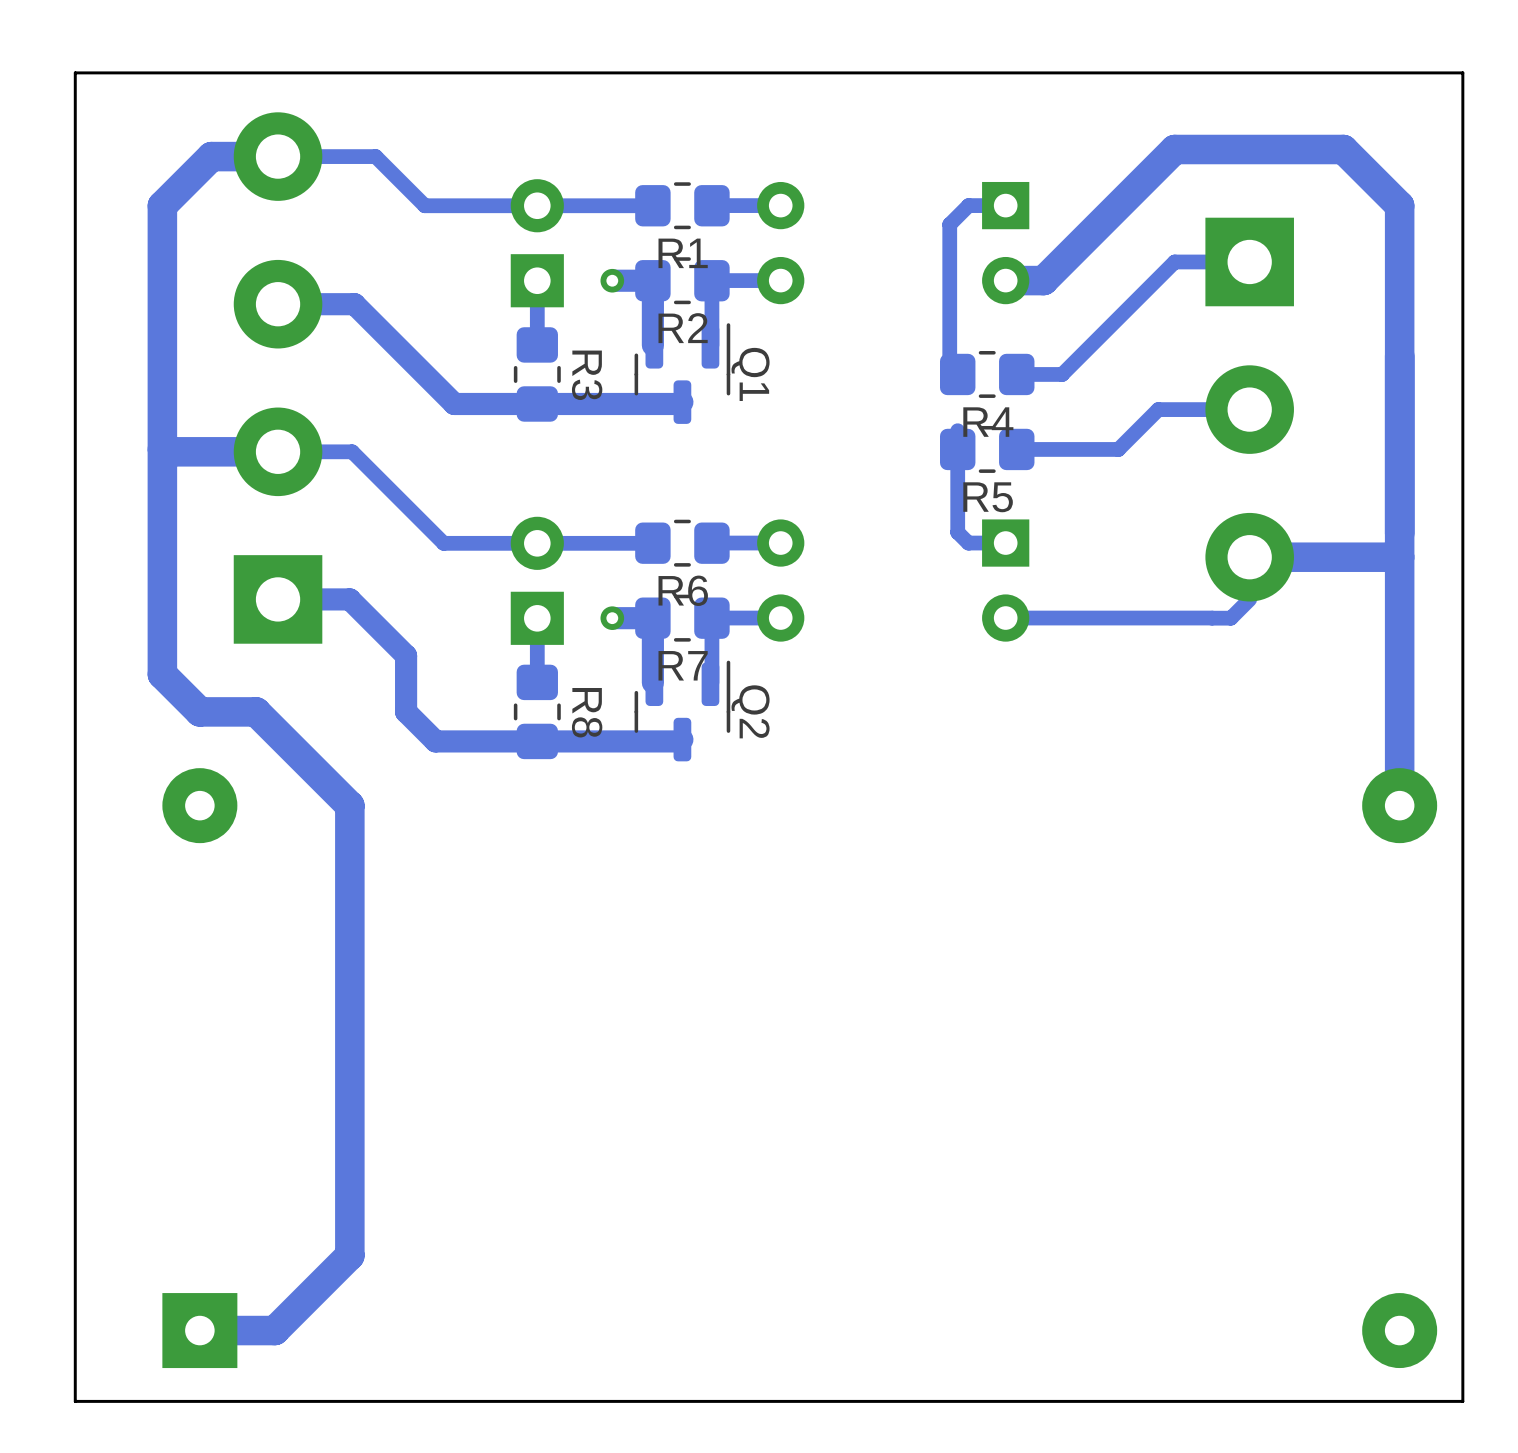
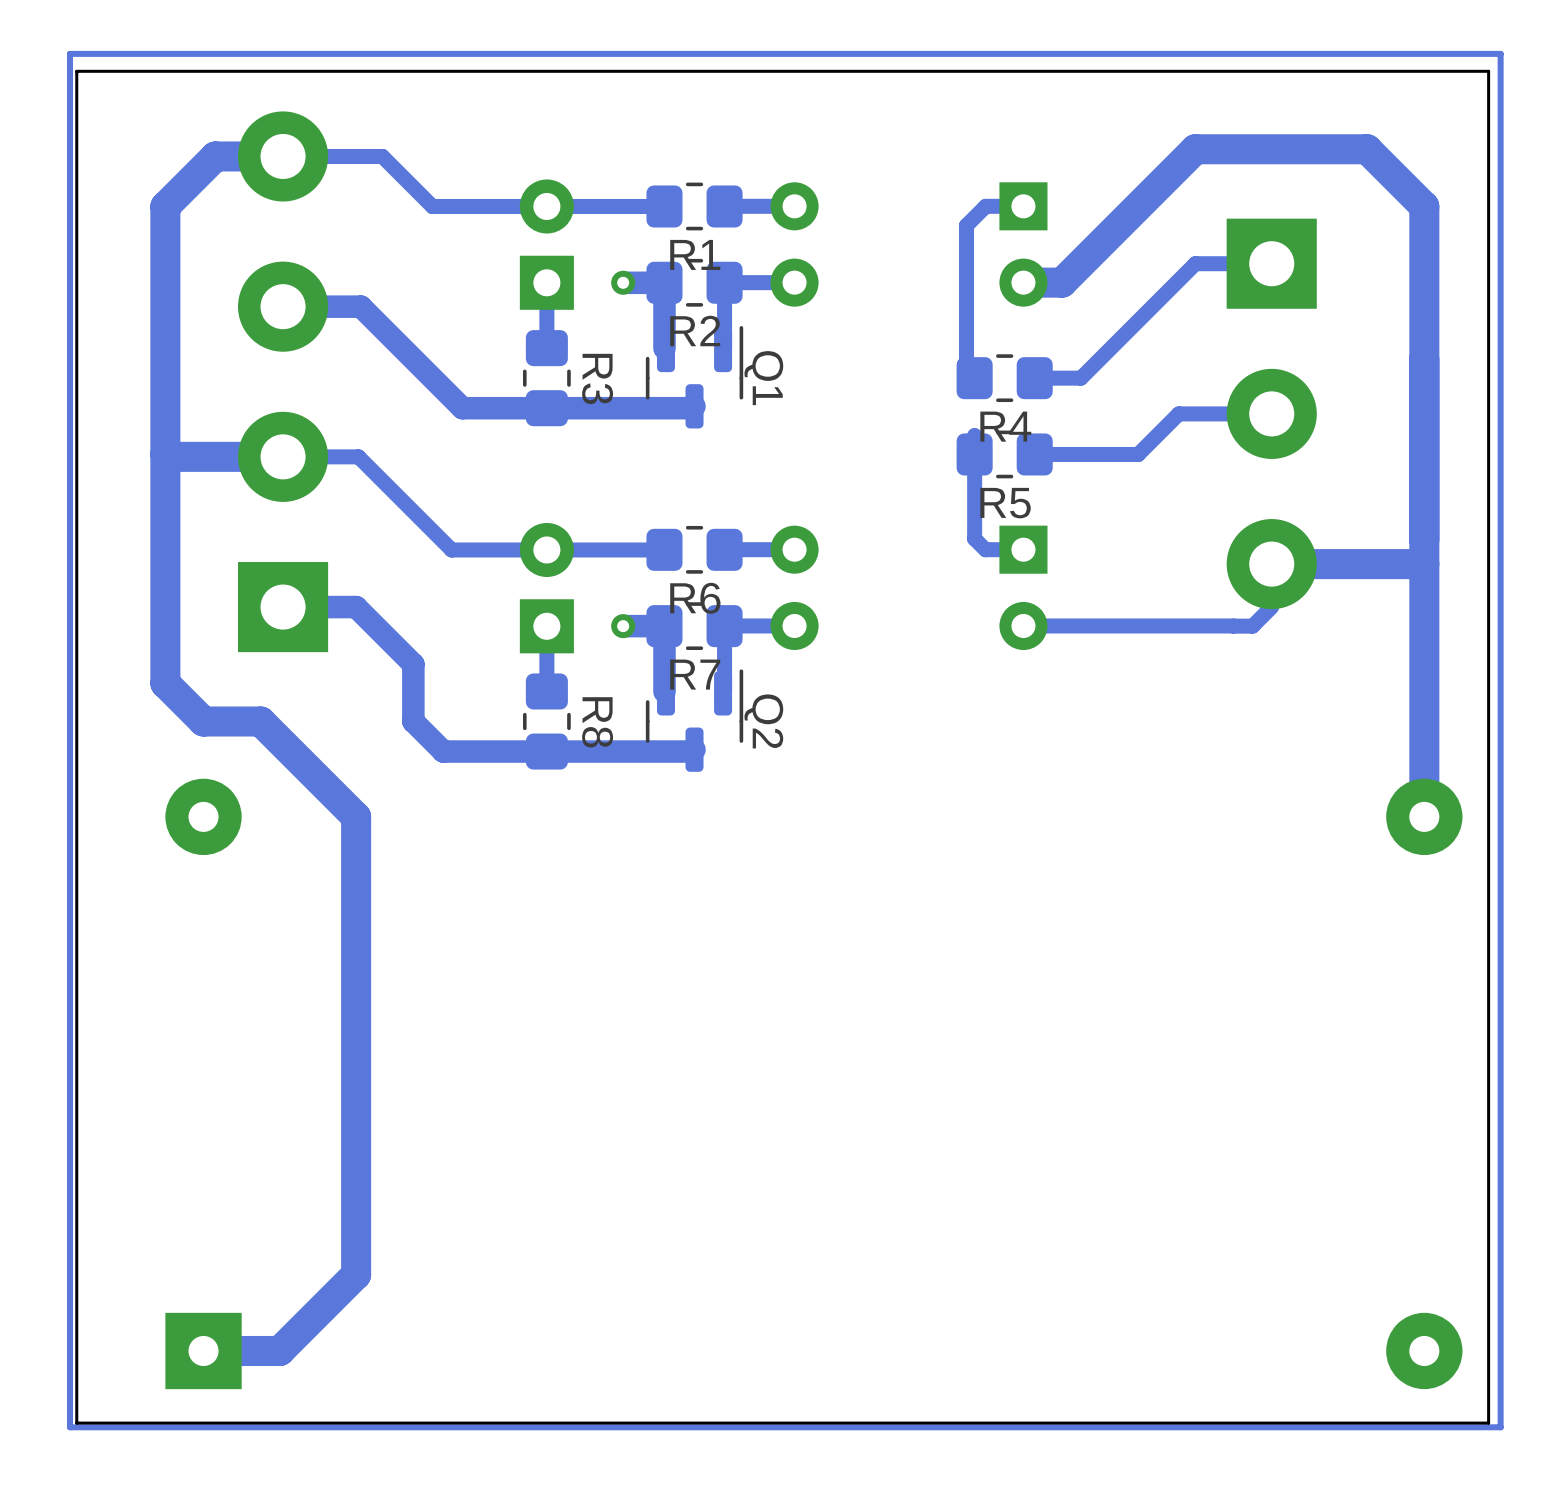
track: none -> (1500, 53) (70, 53) (70, 1427) (1500, 1427) (1500, 53)

